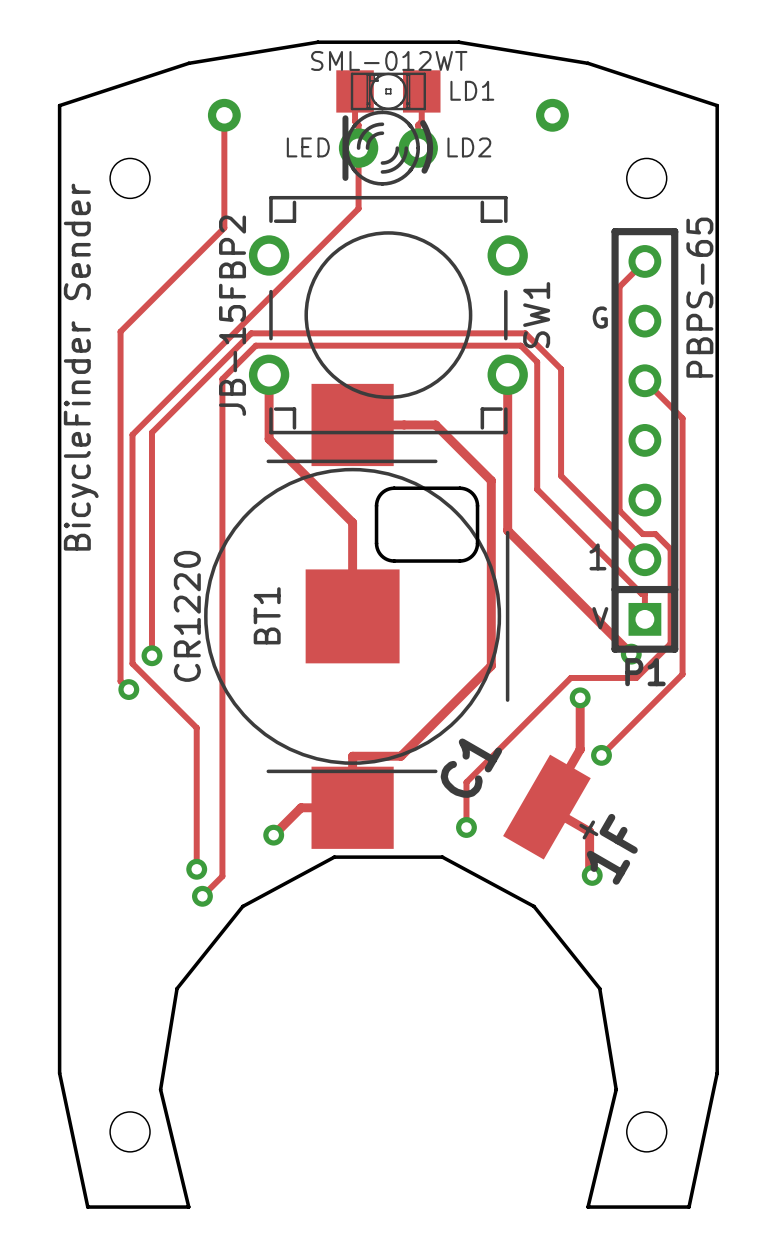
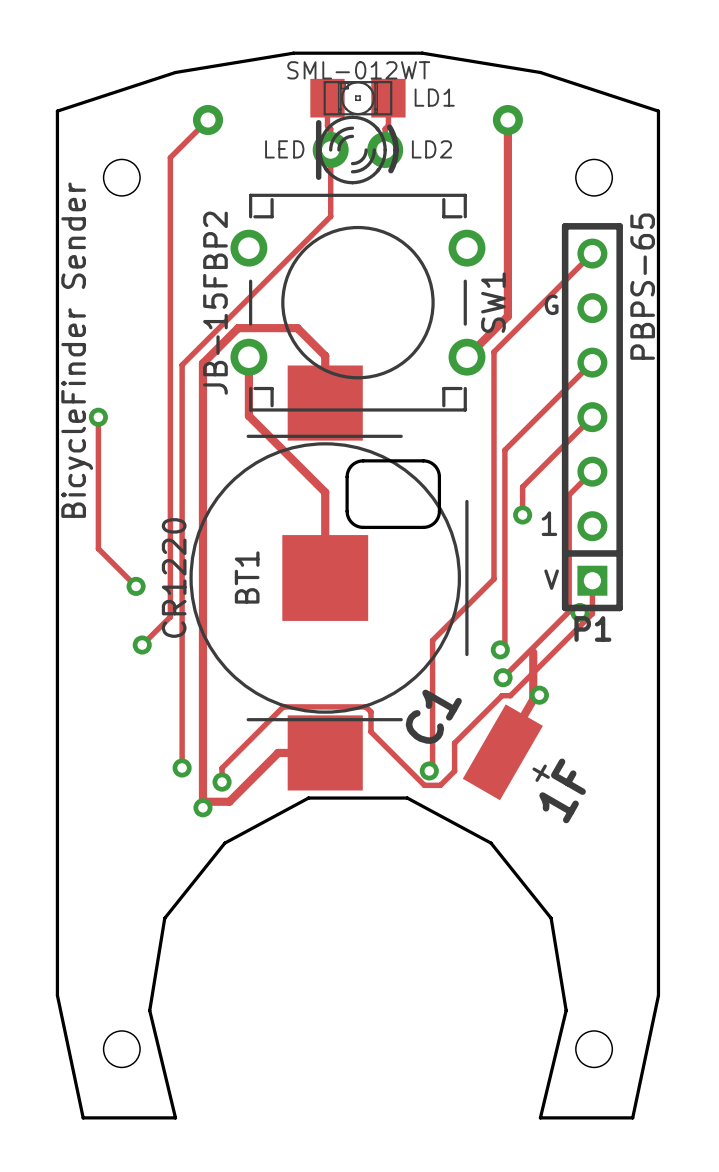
track: (224, 115) (224, 227) (120, 331) (120, 681) (128, 689) -> (208, 120) (170, 157) (170, 616) (142, 645)
track: (358, 208) (132, 434) (132, 663) (196, 727) (196, 869) -> (330, 205) (330, 216) (182, 365) (182, 768)
track: (619, 286) (619, 510) (642, 534) (655, 534) (670, 549) (670, 643) (636, 677) (570, 677) (466, 782) (466, 827) -> (569, 276) (493, 351)
track: (537, 369) (537, 362) (520, 345) (255, 345) (222, 379) (222, 876) (202, 896) -> none
track: (507, 374) (507, 530) (631, 654) -> (467, 357) (507, 316) (507, 120)
track: (644, 380) (682, 418) (682, 674) (601, 755) -> (592, 362) (504, 450) (504, 645) (500, 649)
track: (352, 424) (435, 424) (491, 480) (491, 665) (400, 756) (352, 756) (352, 807) -> (325, 403) (325, 355) (297, 328) (238, 328) (202, 363) (202, 807)
track: none -> (98, 417) (98, 548) (136, 586)
via: none -> (98, 417)
track: none -> (592, 417) (522, 486) (522, 514)
track: (537, 489) (641, 594) (644, 594) (644, 619) -> (493, 462) (493, 579) (432, 640) (432, 767)
track: none -> (592, 471) (569, 494) (569, 611) (503, 677)
via: none -> (522, 514)
track: (644, 559) (561, 475) (561, 369) (525, 333) (251, 333) (151, 432) (151, 655) -> none
track: none -> (592, 580) (592, 613) (510, 695) (502, 695) (454, 743) (454, 771) (440, 785) (424, 785) (370, 731) (370, 711) (365, 706) (283, 706) (222, 768) (222, 782)
via: none -> (136, 586)
via: (151, 655) -> none
via: (128, 689) -> none
via: none -> (142, 645)
via: none -> (500, 649)
via: (580, 697) -> none
via: none -> (503, 677)
via position: (601, 755) -> (539, 695)
track: (301, 807) (273, 835) -> (278, 753) (229, 801) (202, 801)
track: (546, 807) (589, 831) (589, 872) (592, 875) -> none
via: none -> (182, 768)
via: (273, 835) -> none
via: none -> (222, 782)
via: none -> (202, 807)
via: (196, 869) -> none
via: (592, 875) -> none
via: (202, 896) -> none

